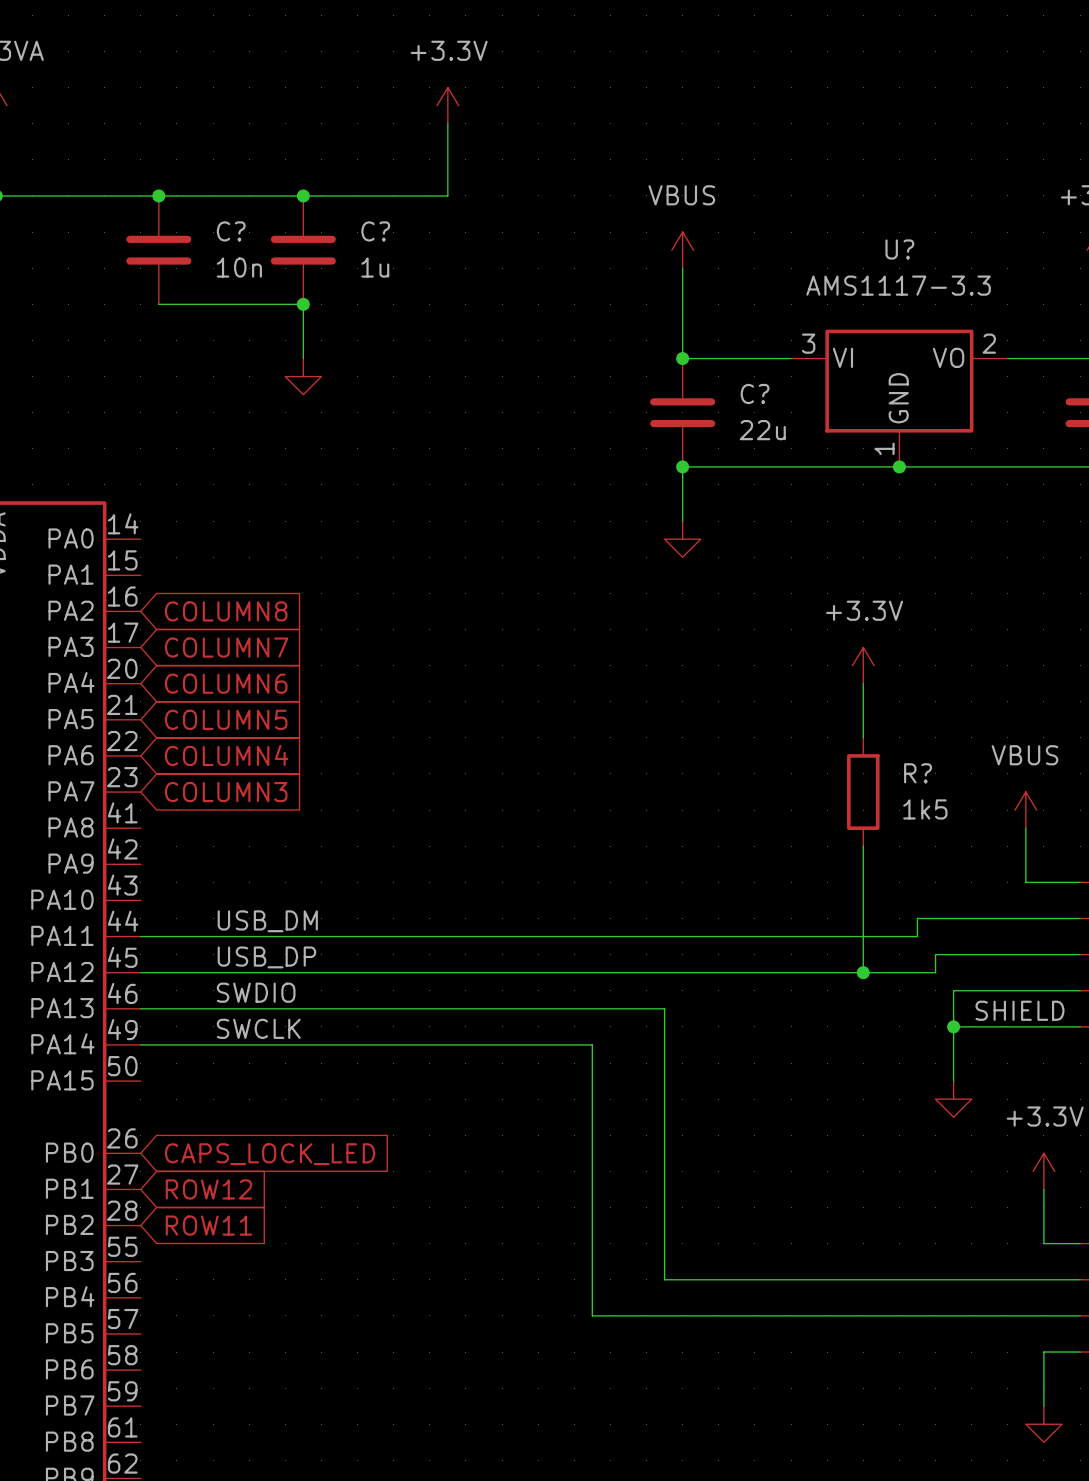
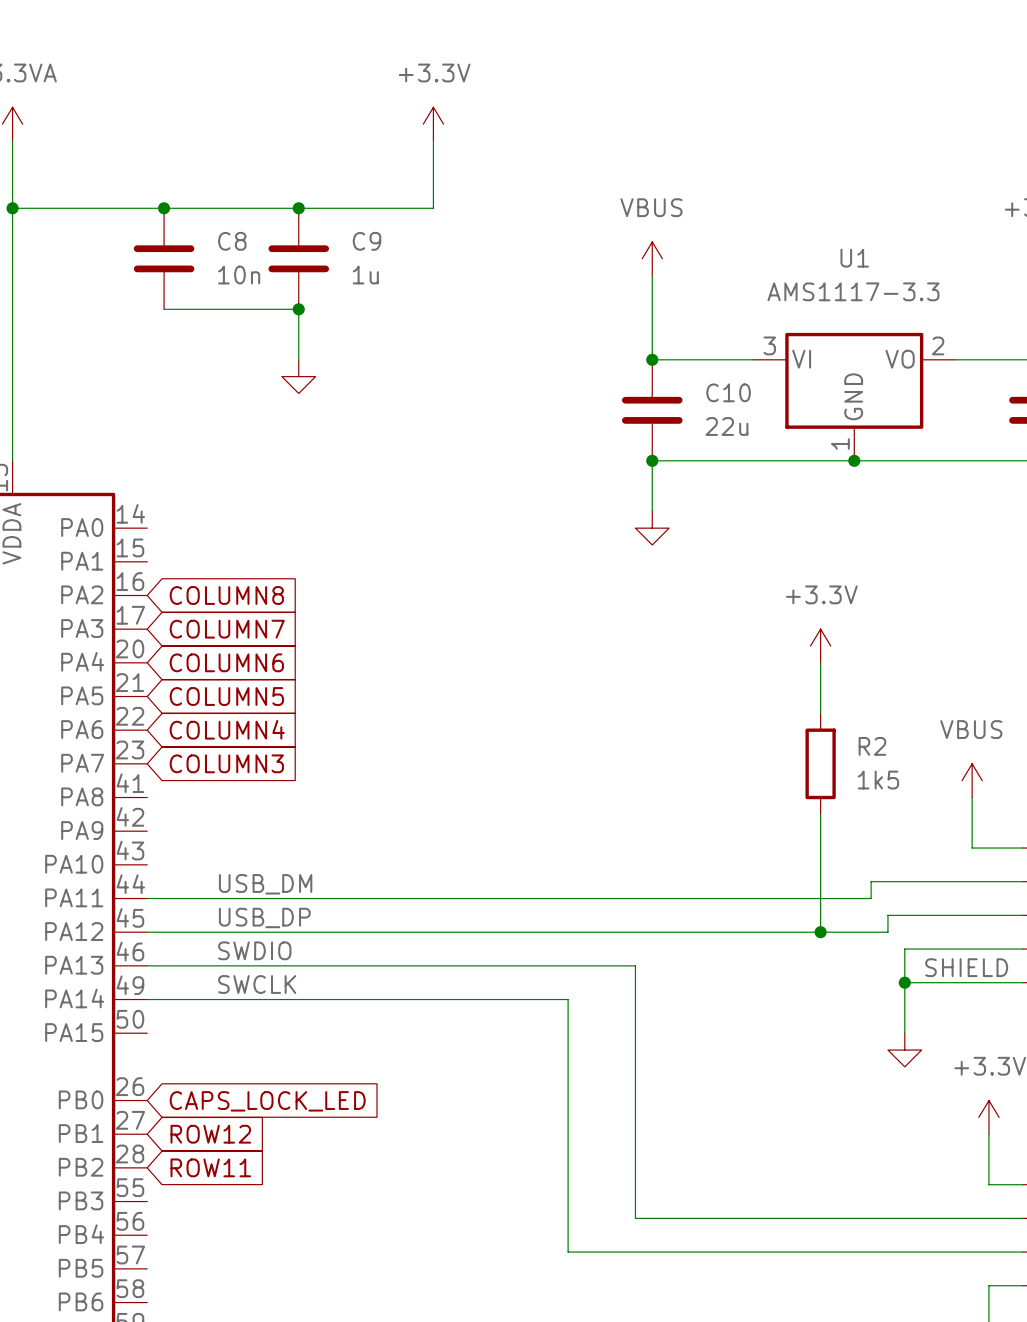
C? name: C? (231, 231) -> C8 (232, 241)
C? name: C? (375, 231) -> C9 (367, 241)
U? name: U? (899, 249) -> U1 (854, 258)
C? name: C? (755, 393) -> C10 (728, 392)
R? name: R? (918, 773) -> R2 (872, 746)

